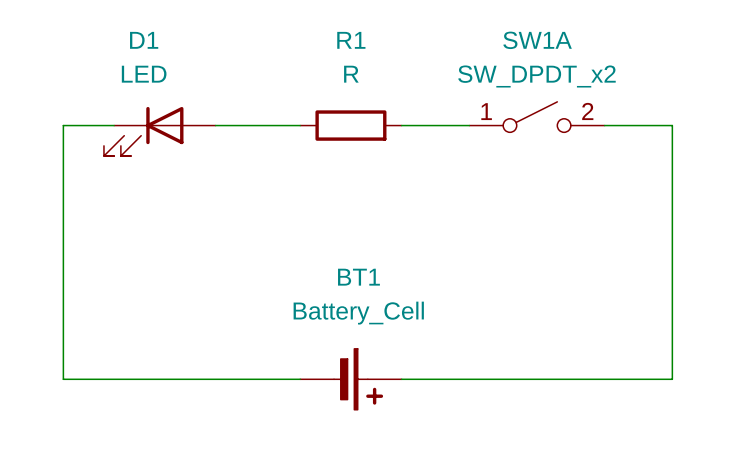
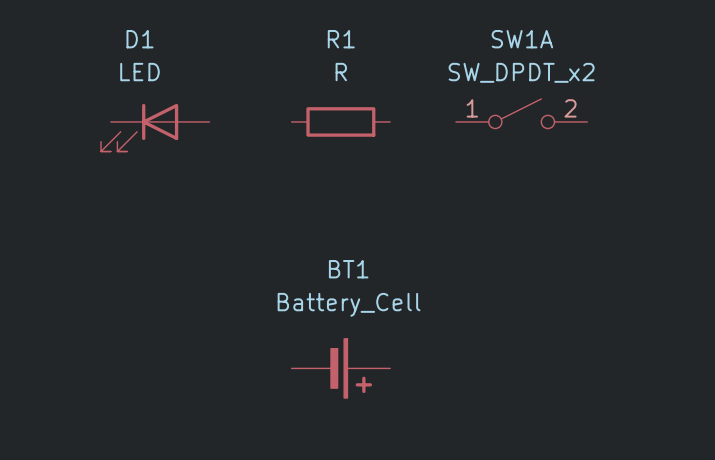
wire: (114, 125) (63, 125) (63, 379) (300, 379) -> none
wire: (215, 125) (300, 125) -> none
wire: (401, 125) (469, 125) -> none
wire: (604, 125) (672, 125) (672, 379) (401, 379) -> none

